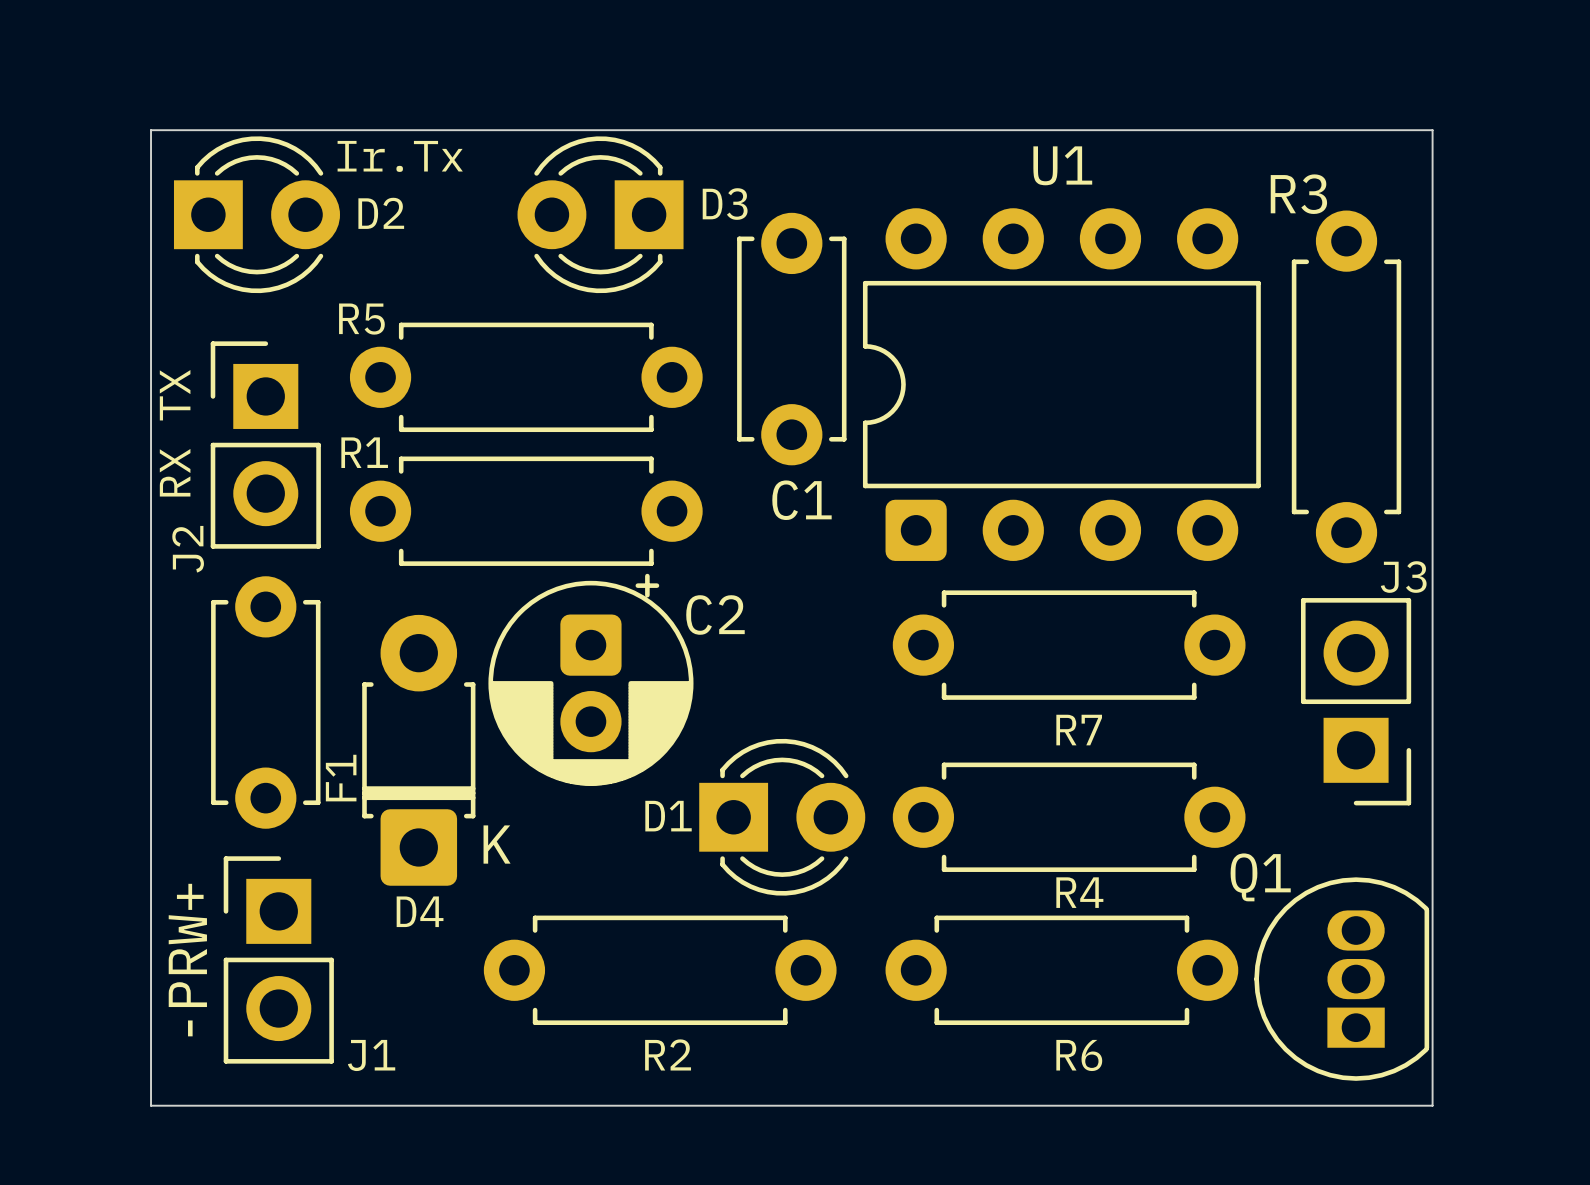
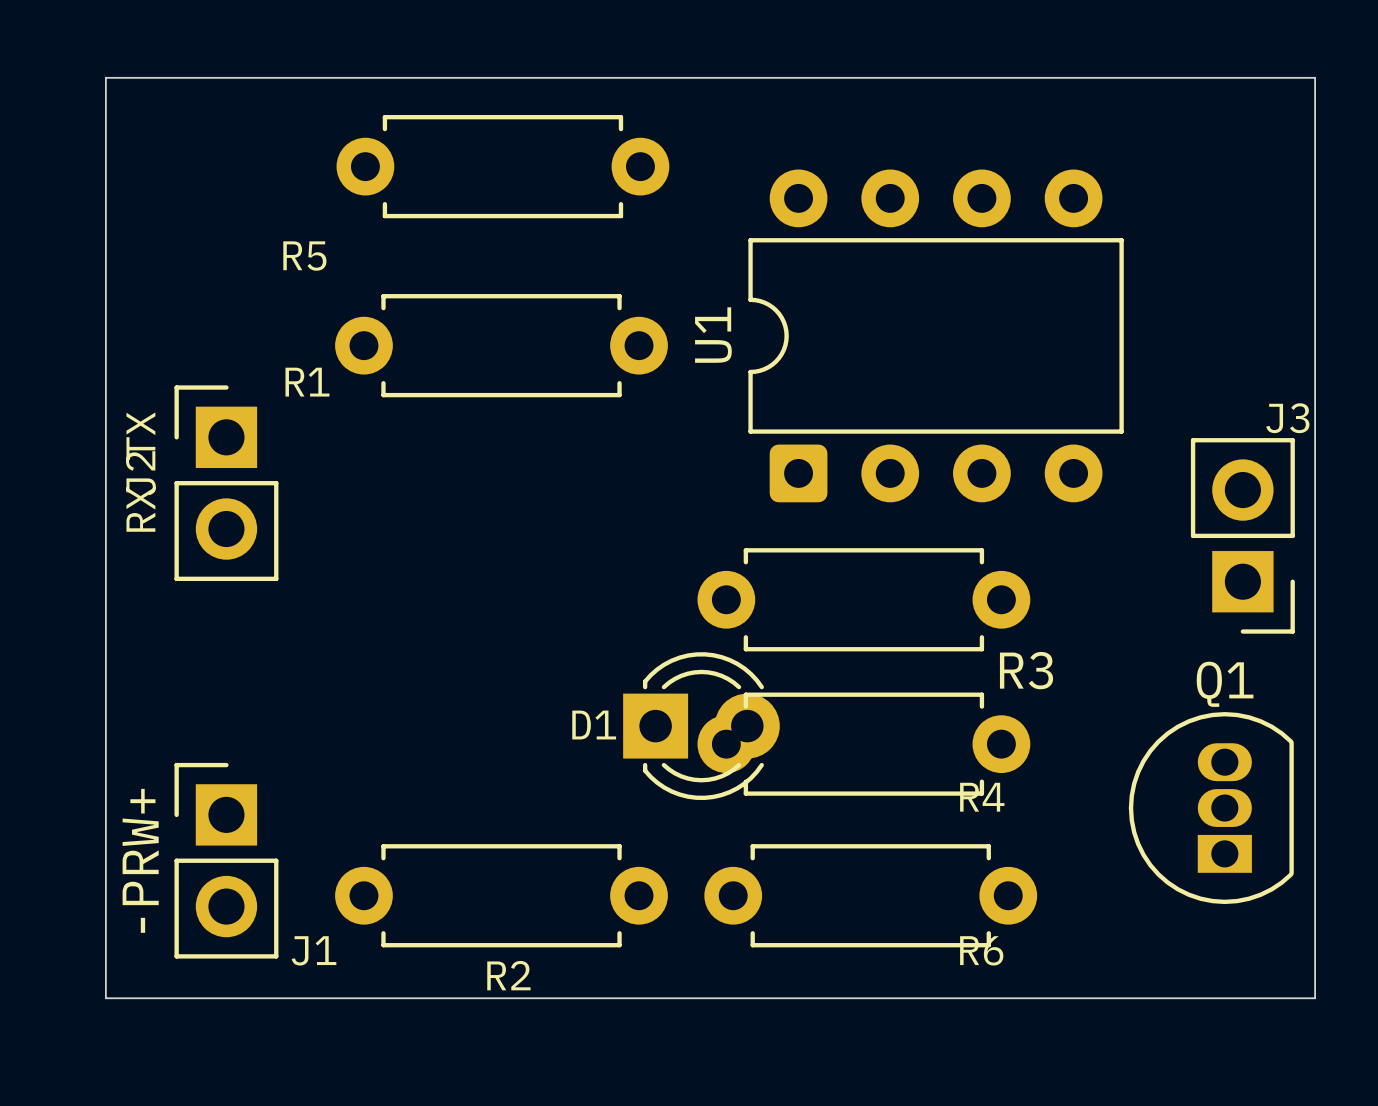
U1 name rotation: 0° (1062, 165) -> 90° counterclockwise (713, 335)
U1 name position: U1 (1062, 165) -> U1 (713, 335)
R3 name position: R3 (1298, 194) -> R3 (1026, 670)
D2: Ir.Tx (256, 214) -> none
D3: (600, 214) -> none
C1: (791, 339) -> none
R5 position: (526, 377) -> (502, 166)
U1 position: (1061, 384) -> (936, 335)
R3 rotation: 0° (1346, 386) -> 90° clockwise (863, 599)
R3 position: (1346, 386) -> (863, 599)
J2 position: (265, 445) -> (226, 483)
R1 position: (526, 511) -> (501, 345)
R7: (1069, 645) -> none
C2: (590, 679) -> none
J3 position: (1356, 701) -> (1242, 535)
F1: (265, 702) -> none
D4: (418, 750) -> none
R4 position: (1069, 817) -> (863, 744)
Q1 name position: Q1 (1260, 877) -> Q1 (1225, 684)
R2 position: (660, 970) -> (501, 895)
R6 position: (1061, 970) -> (870, 895)
Q1 position: (1341, 979) -> (1211, 808)

